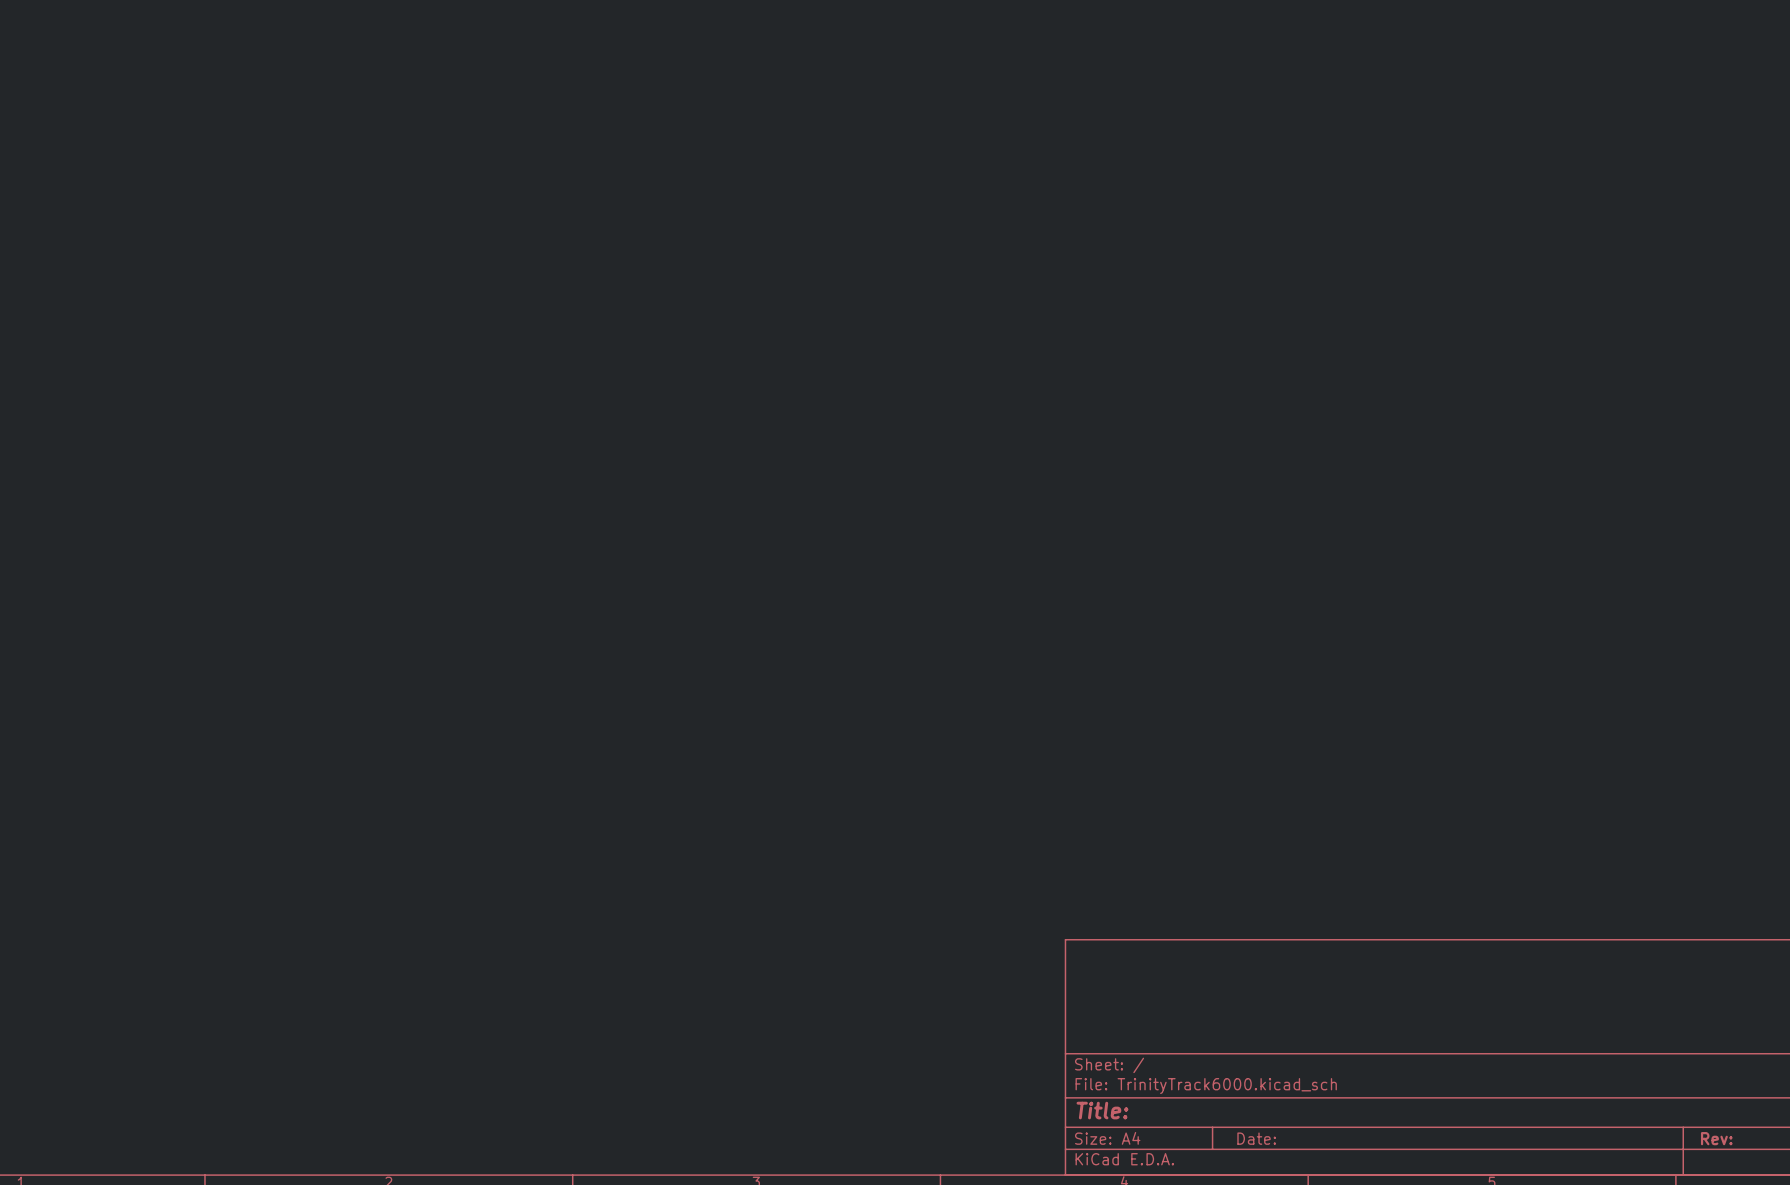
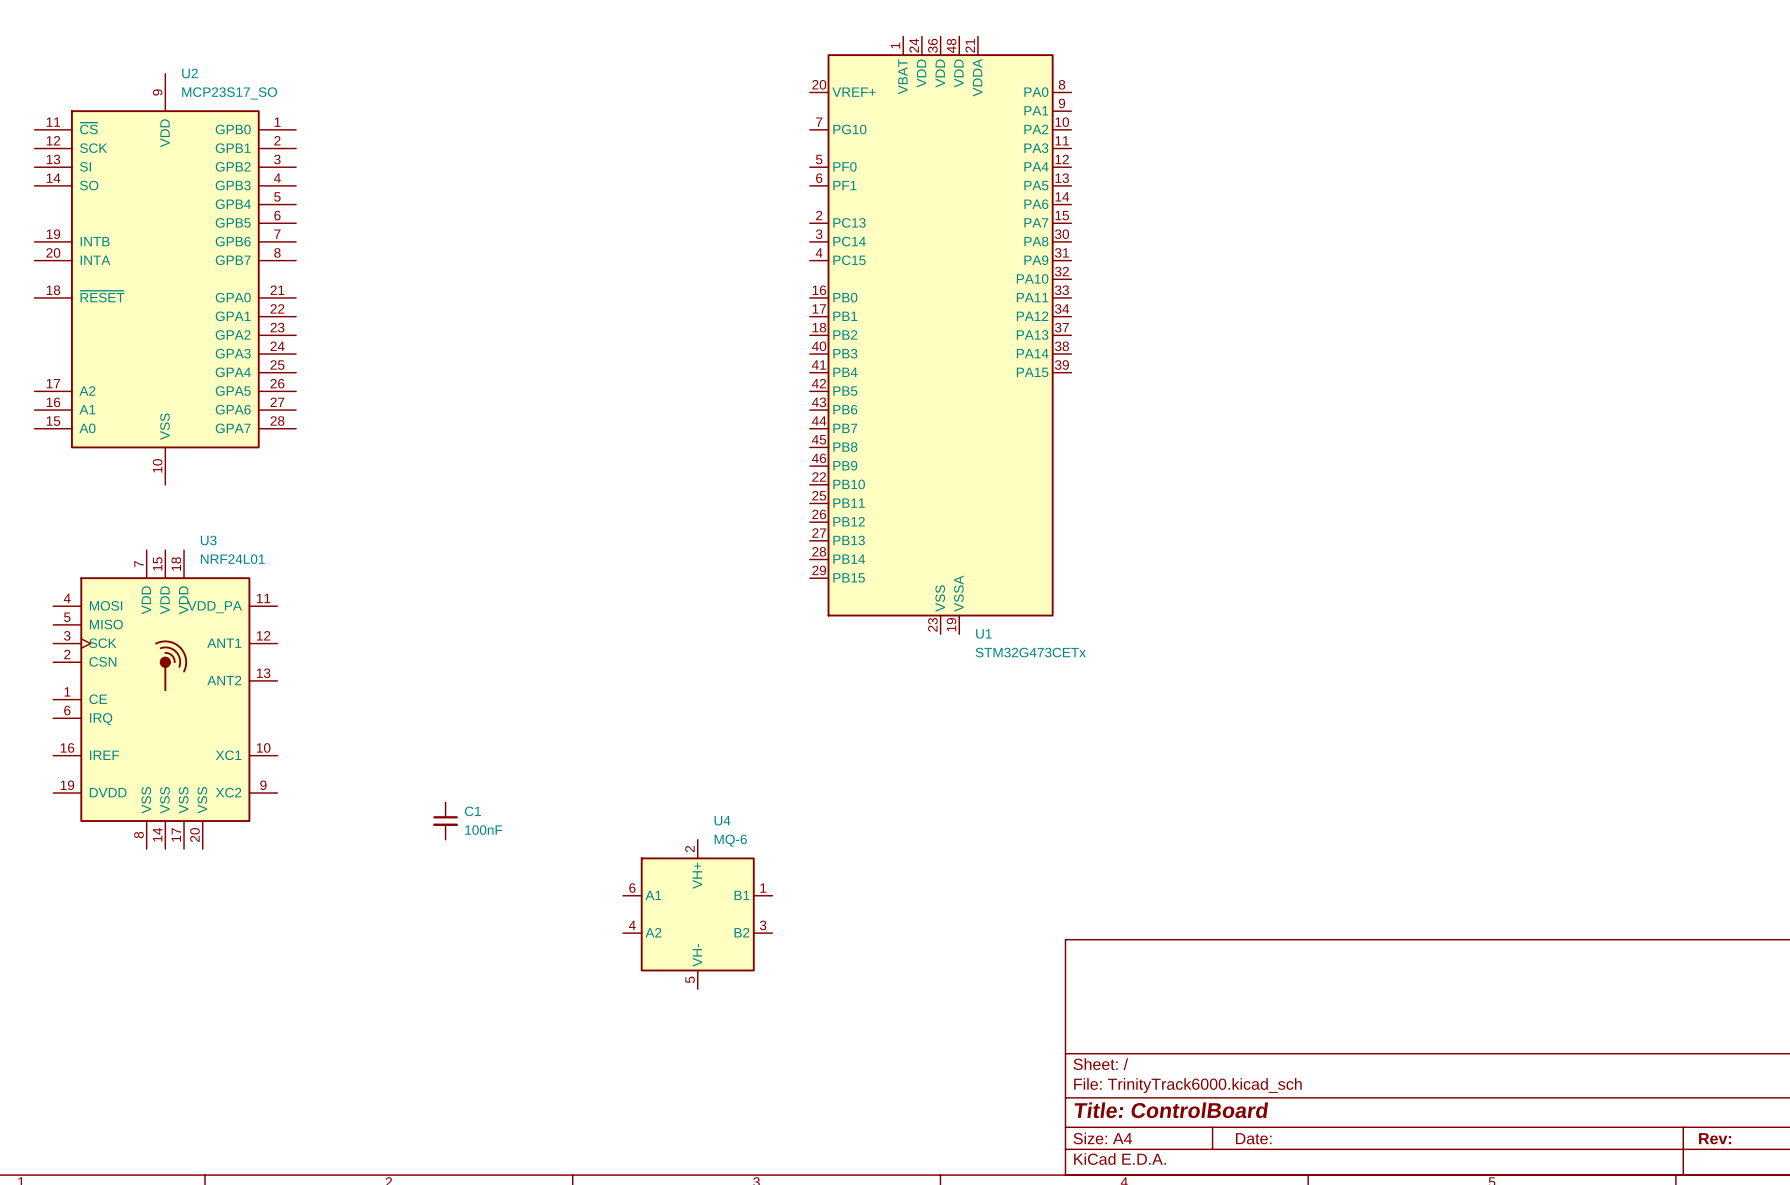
U2: none -> MCP23S17_SO (165, 279)
U1: none -> STM32G473CETx (940, 335)
U3: none -> NRF24L01 (165, 699)
C1: none -> 100nF (445, 821)
U4: none -> MQ-6 (697, 914)
title block: Title: (1102, 1110) -> Title: ControlBoard (1171, 1110)

